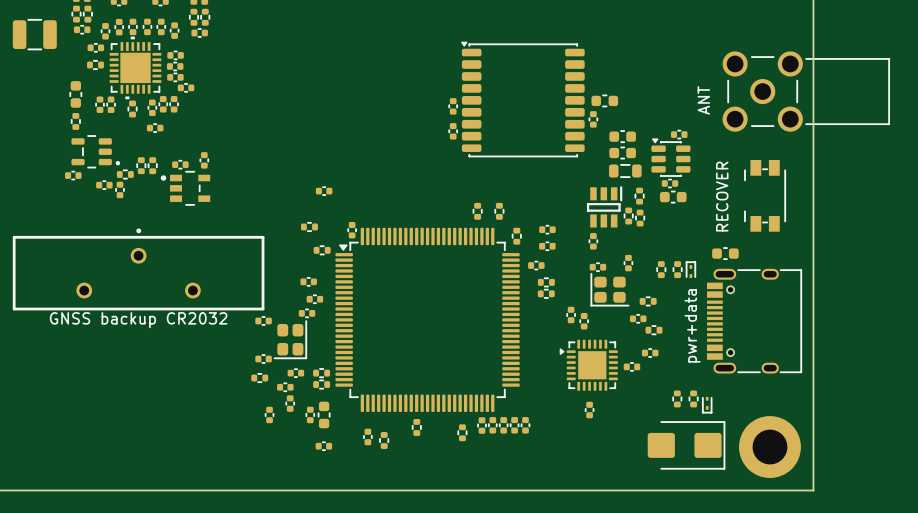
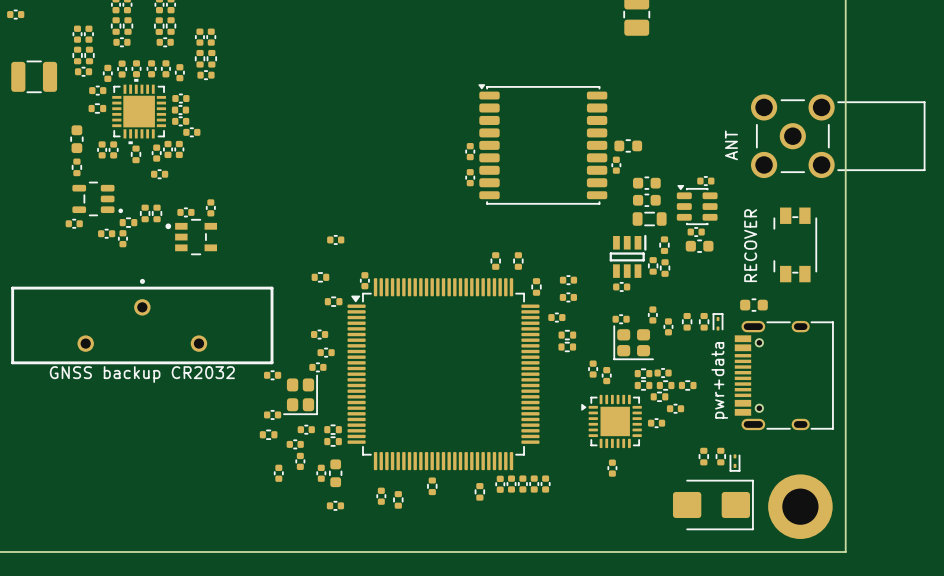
part rotation: 0° (593, 241) -> 90° clockwise (621, 286)
part: none -> (668, 326)
part: (648, 301) -> none
part: none -> (643, 373)
part: none -> (643, 385)
part: none -> (665, 385)
part: (653, 330) -> none
part: none -> (687, 385)
part: none -> (659, 396)

